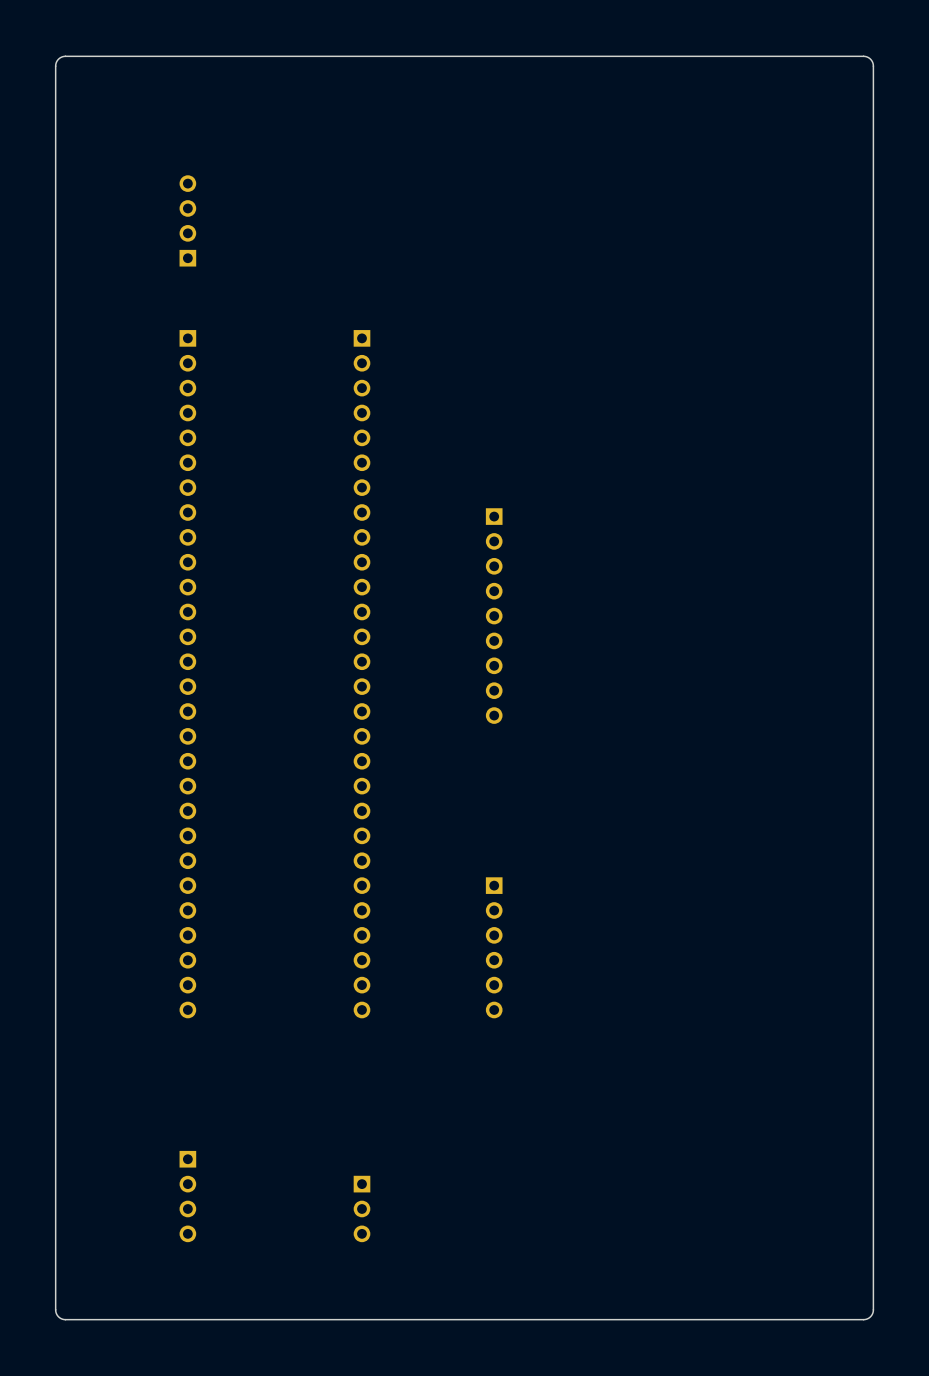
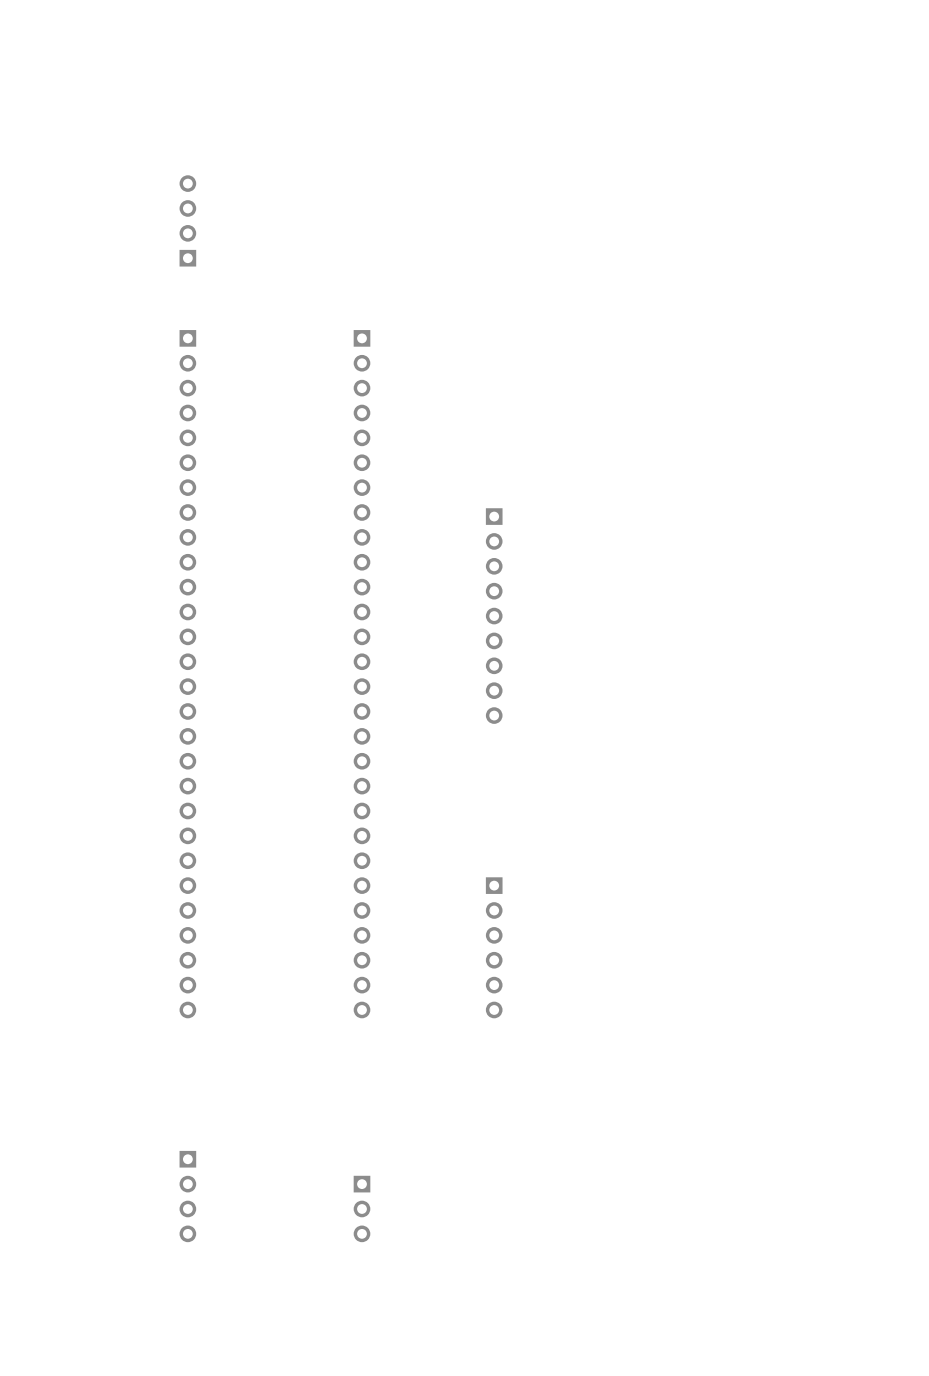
board edge: (863, 56) (65, 56) (57, 60) (55, 1309) (60, 1318) (863, 1319) (871, 1315) (873, 66) (870, 59) (863, 56) -> none

